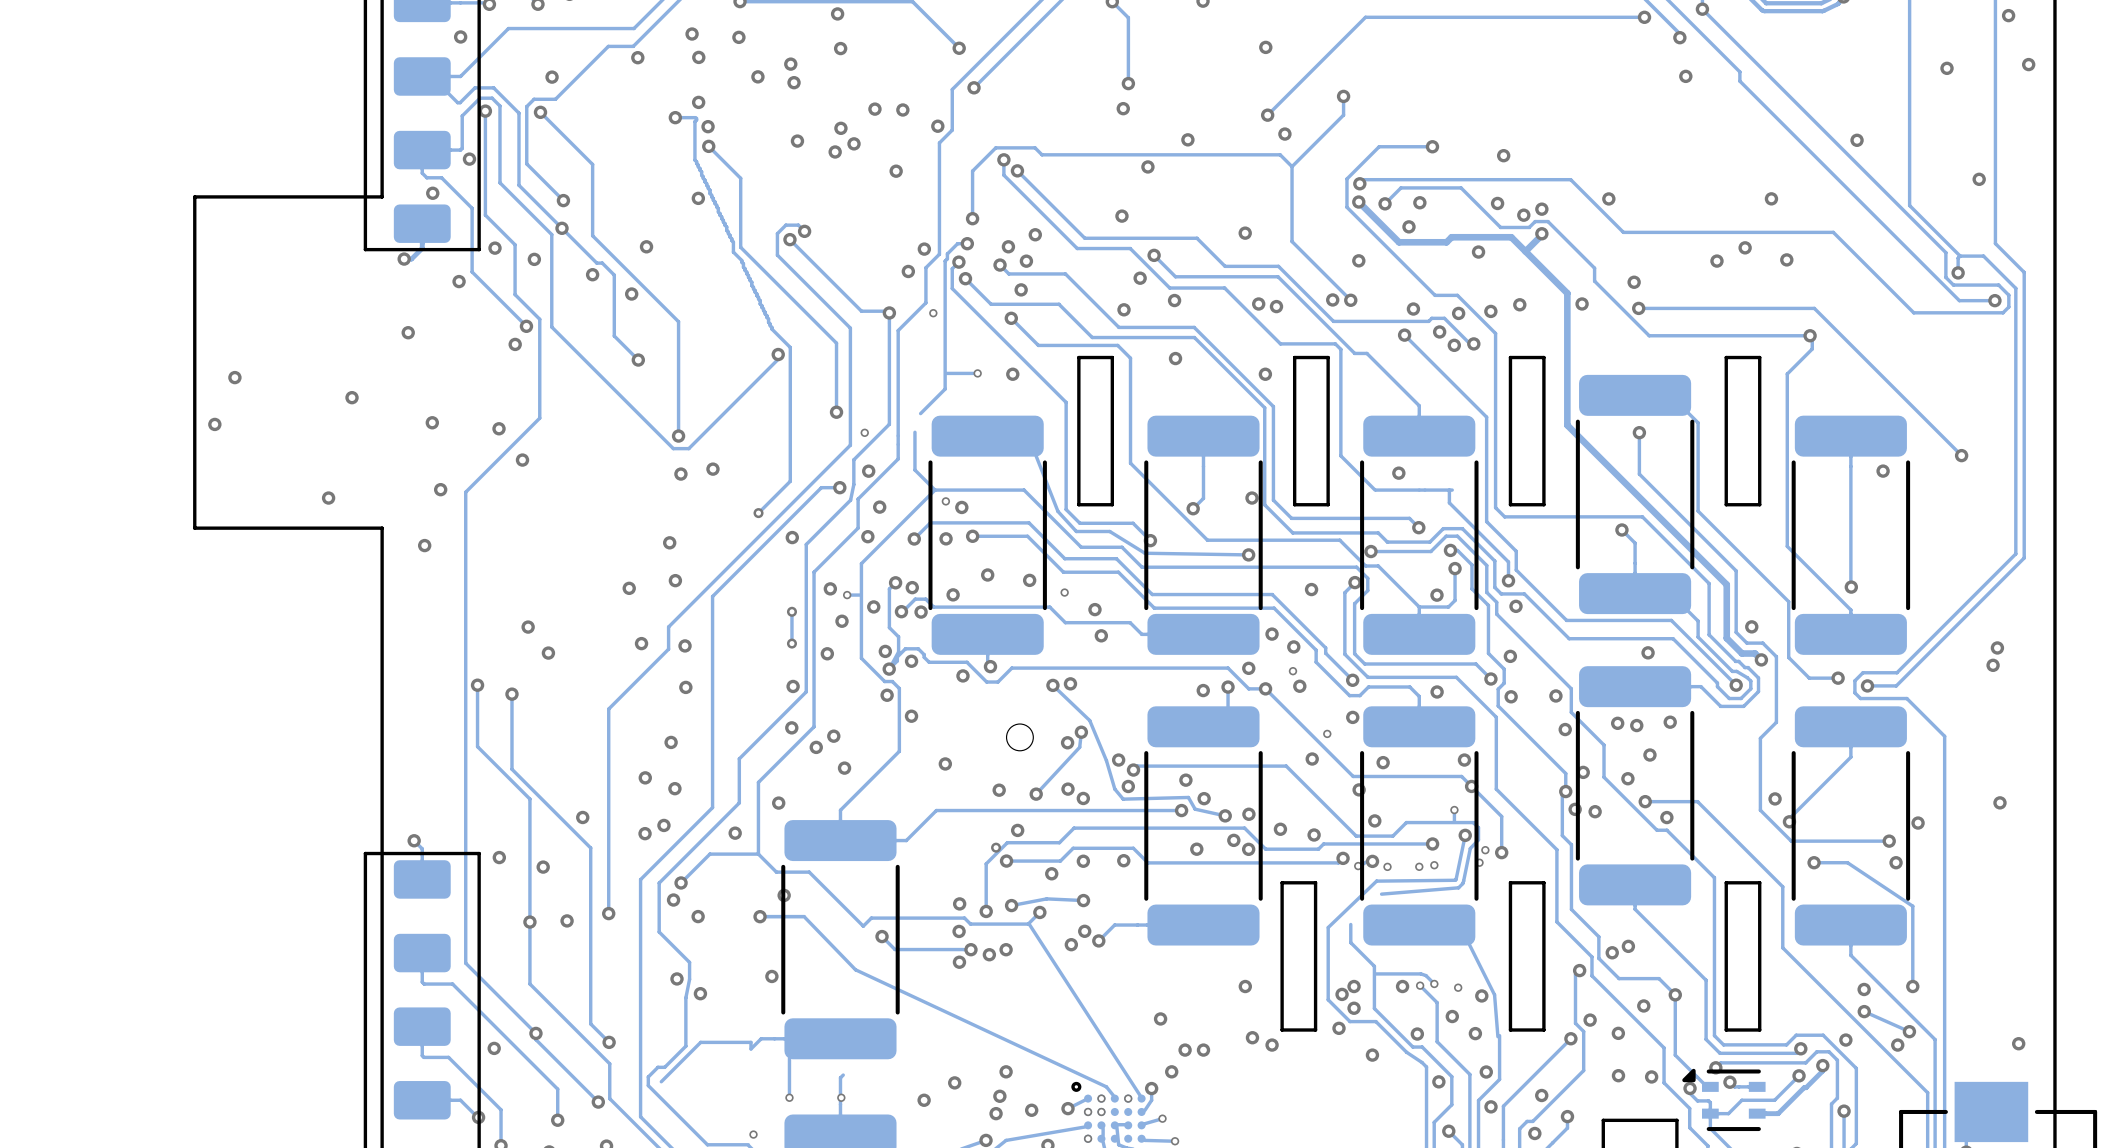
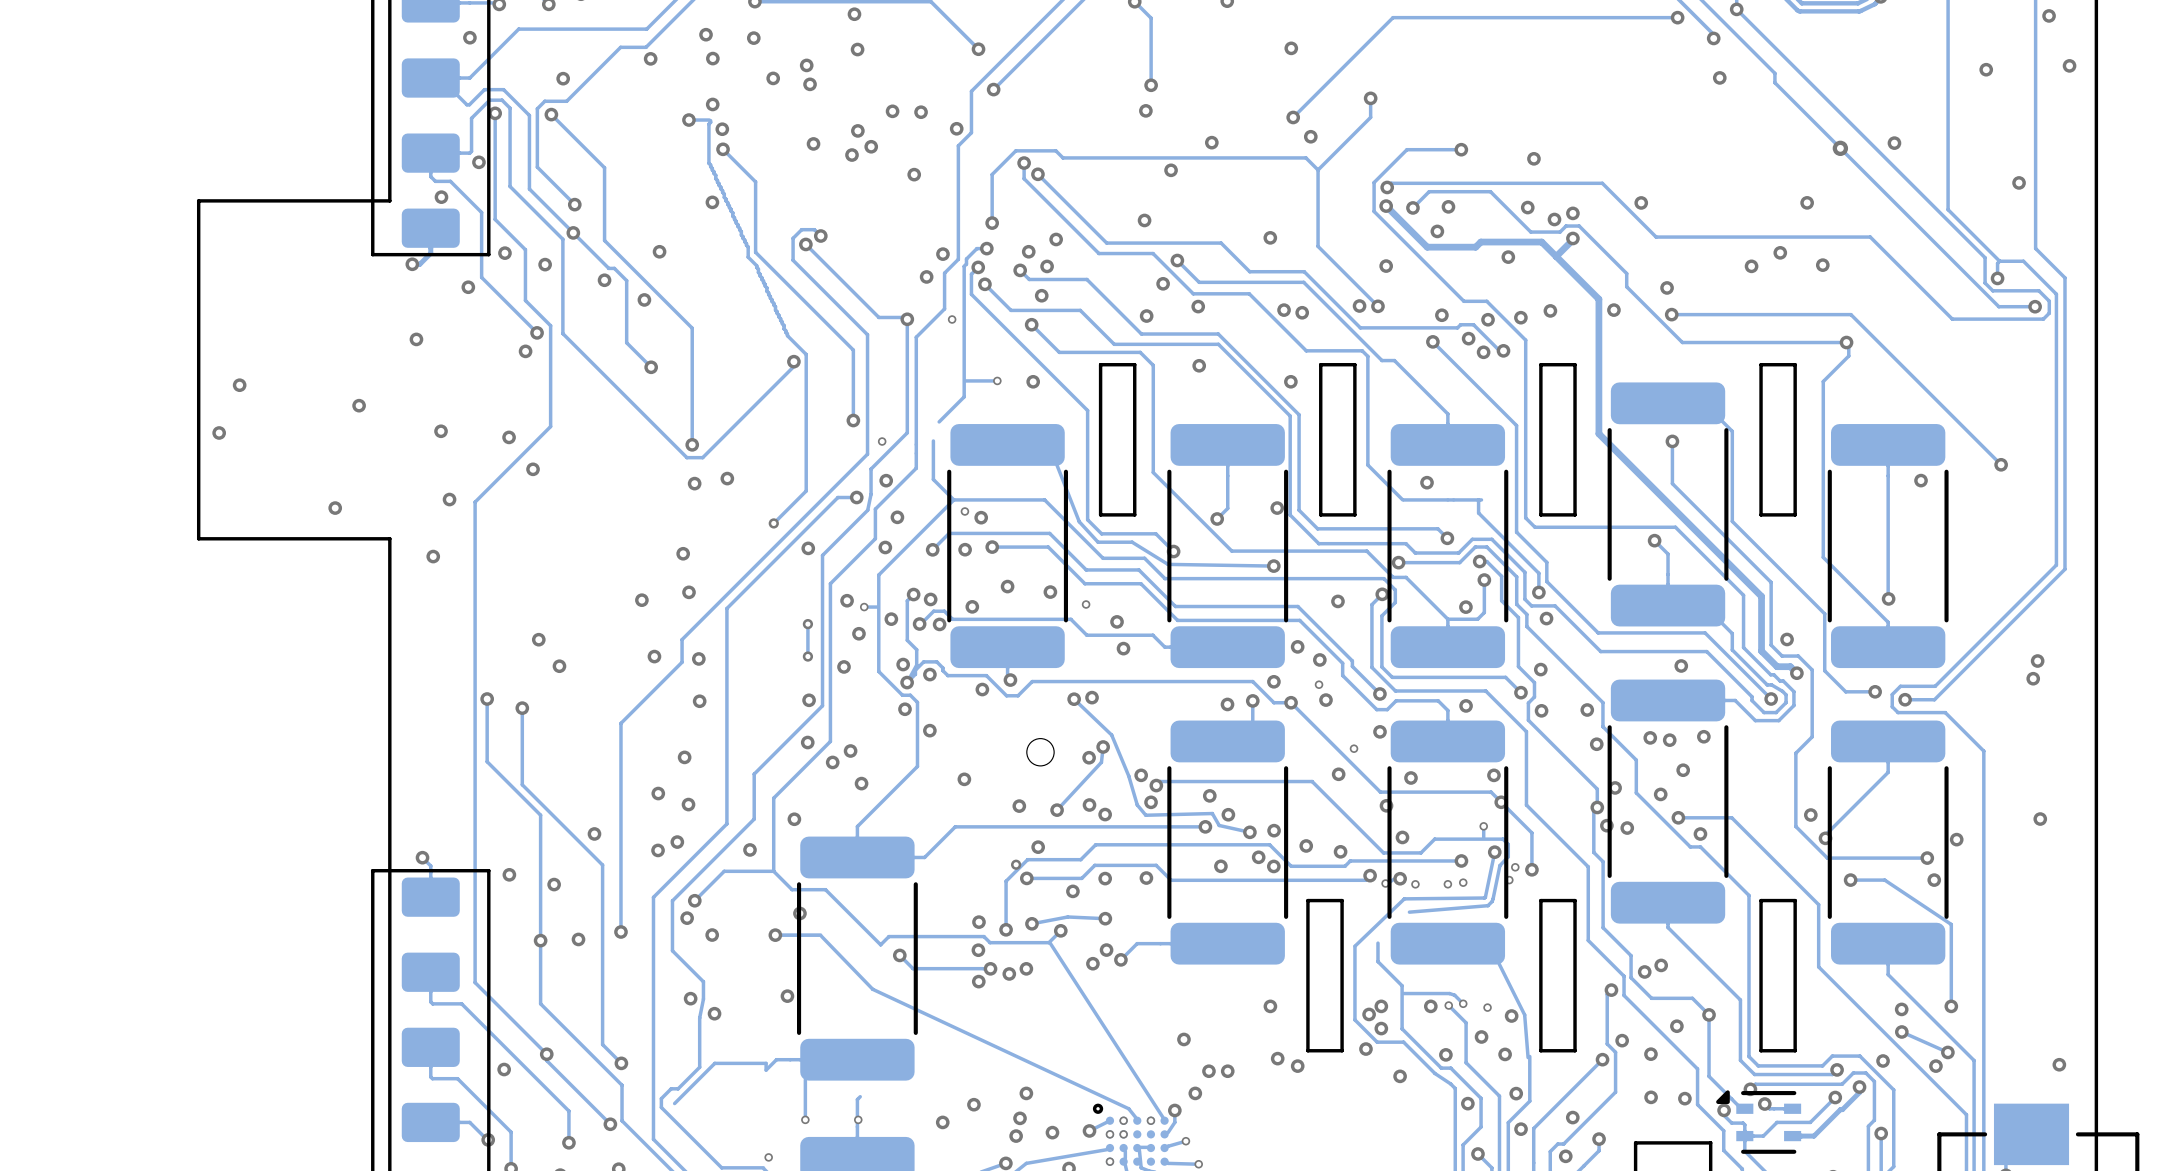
via: none -> (1840, 148)

